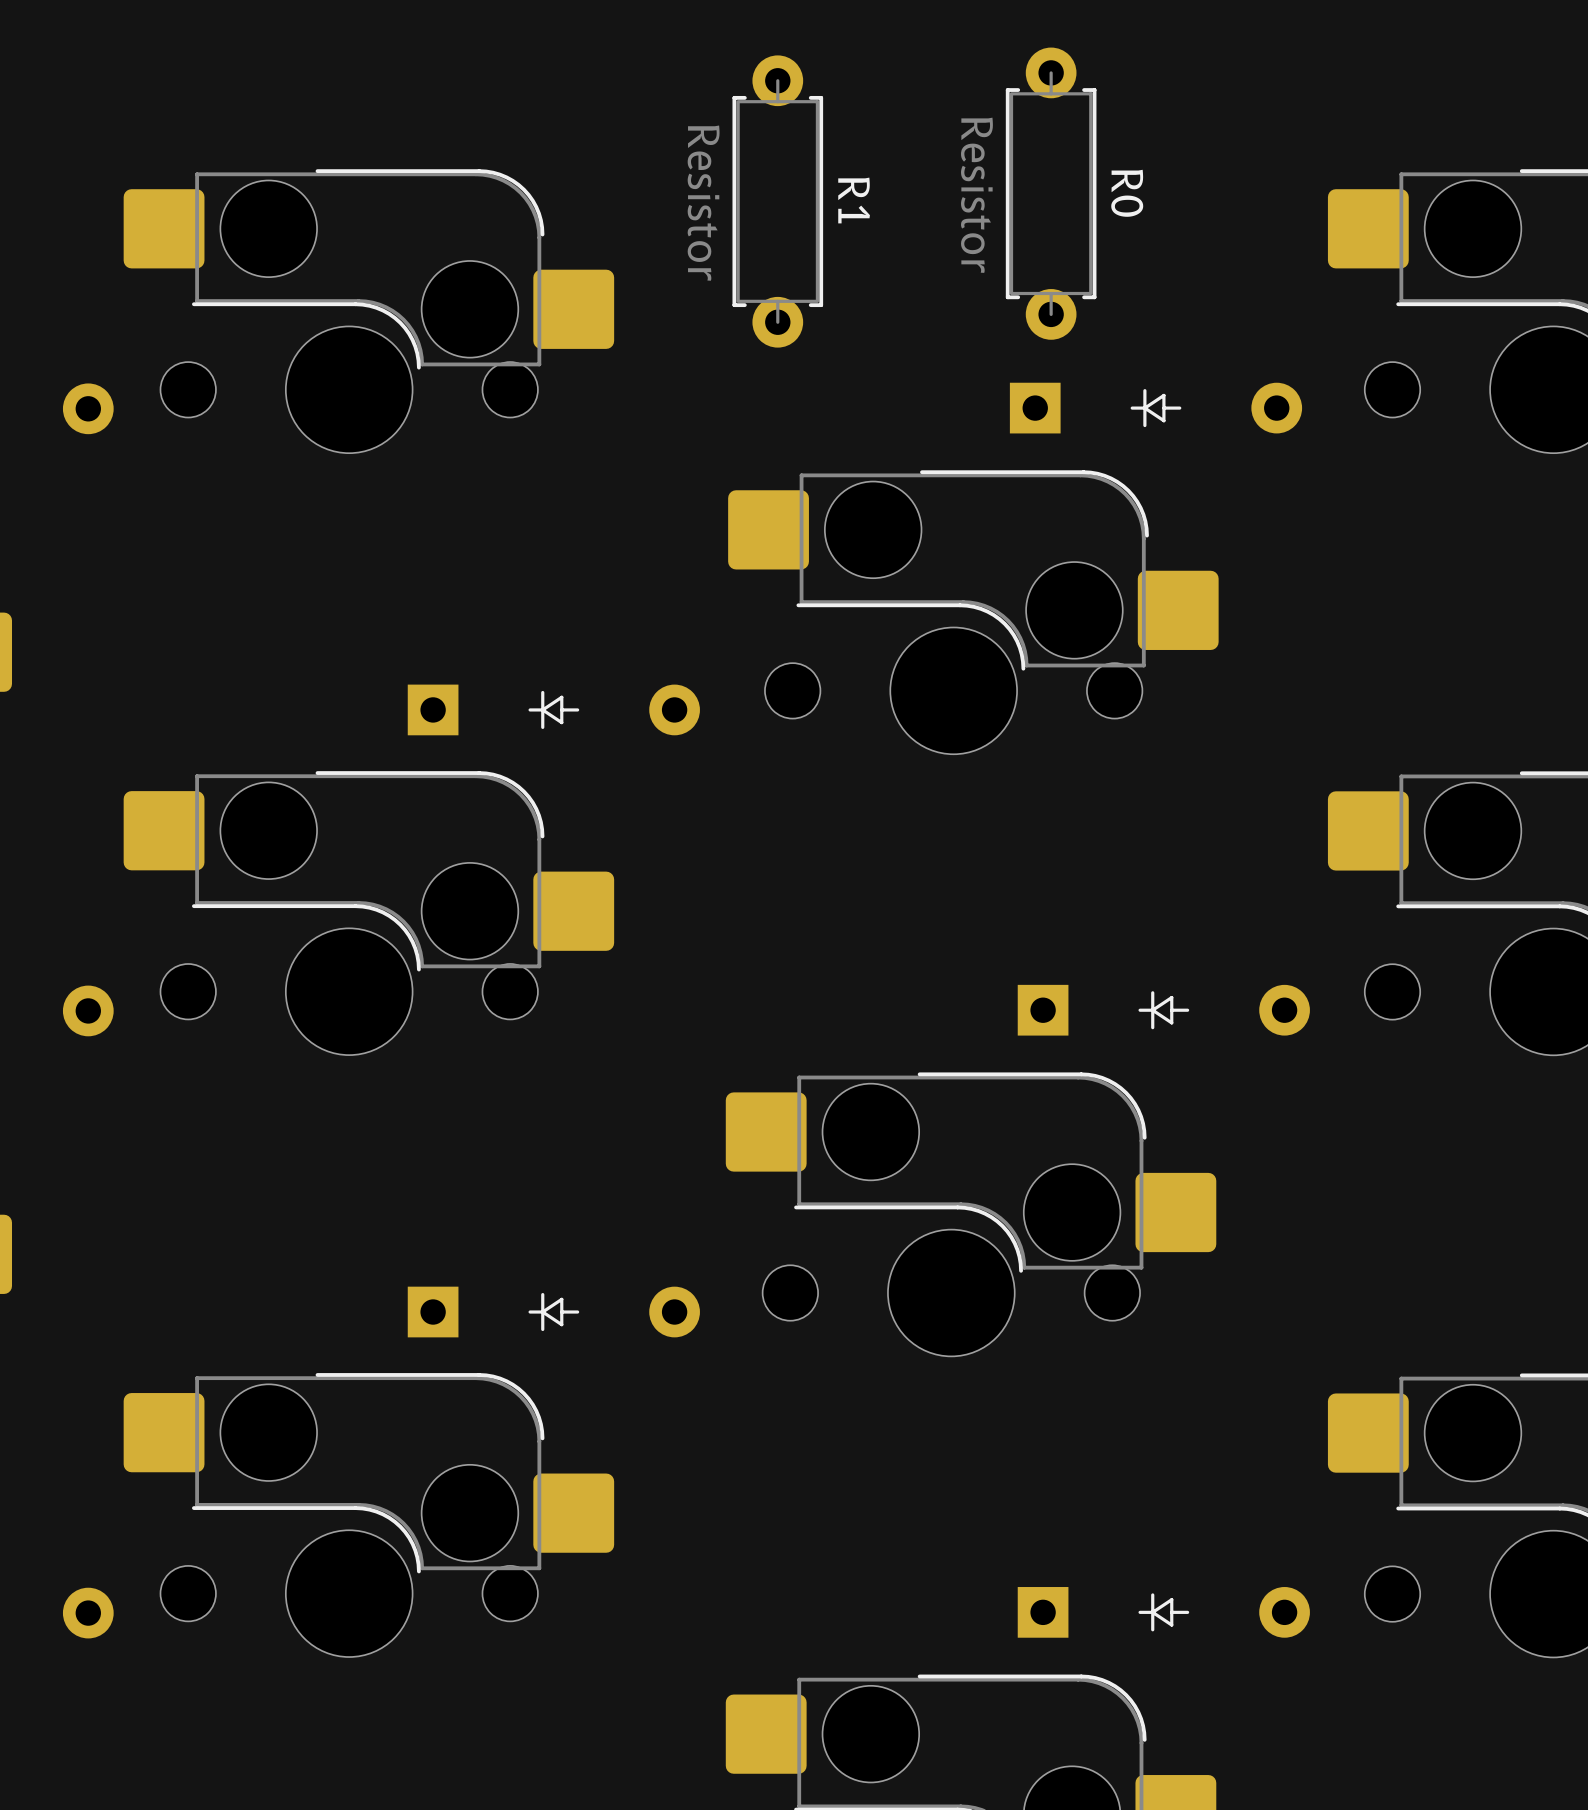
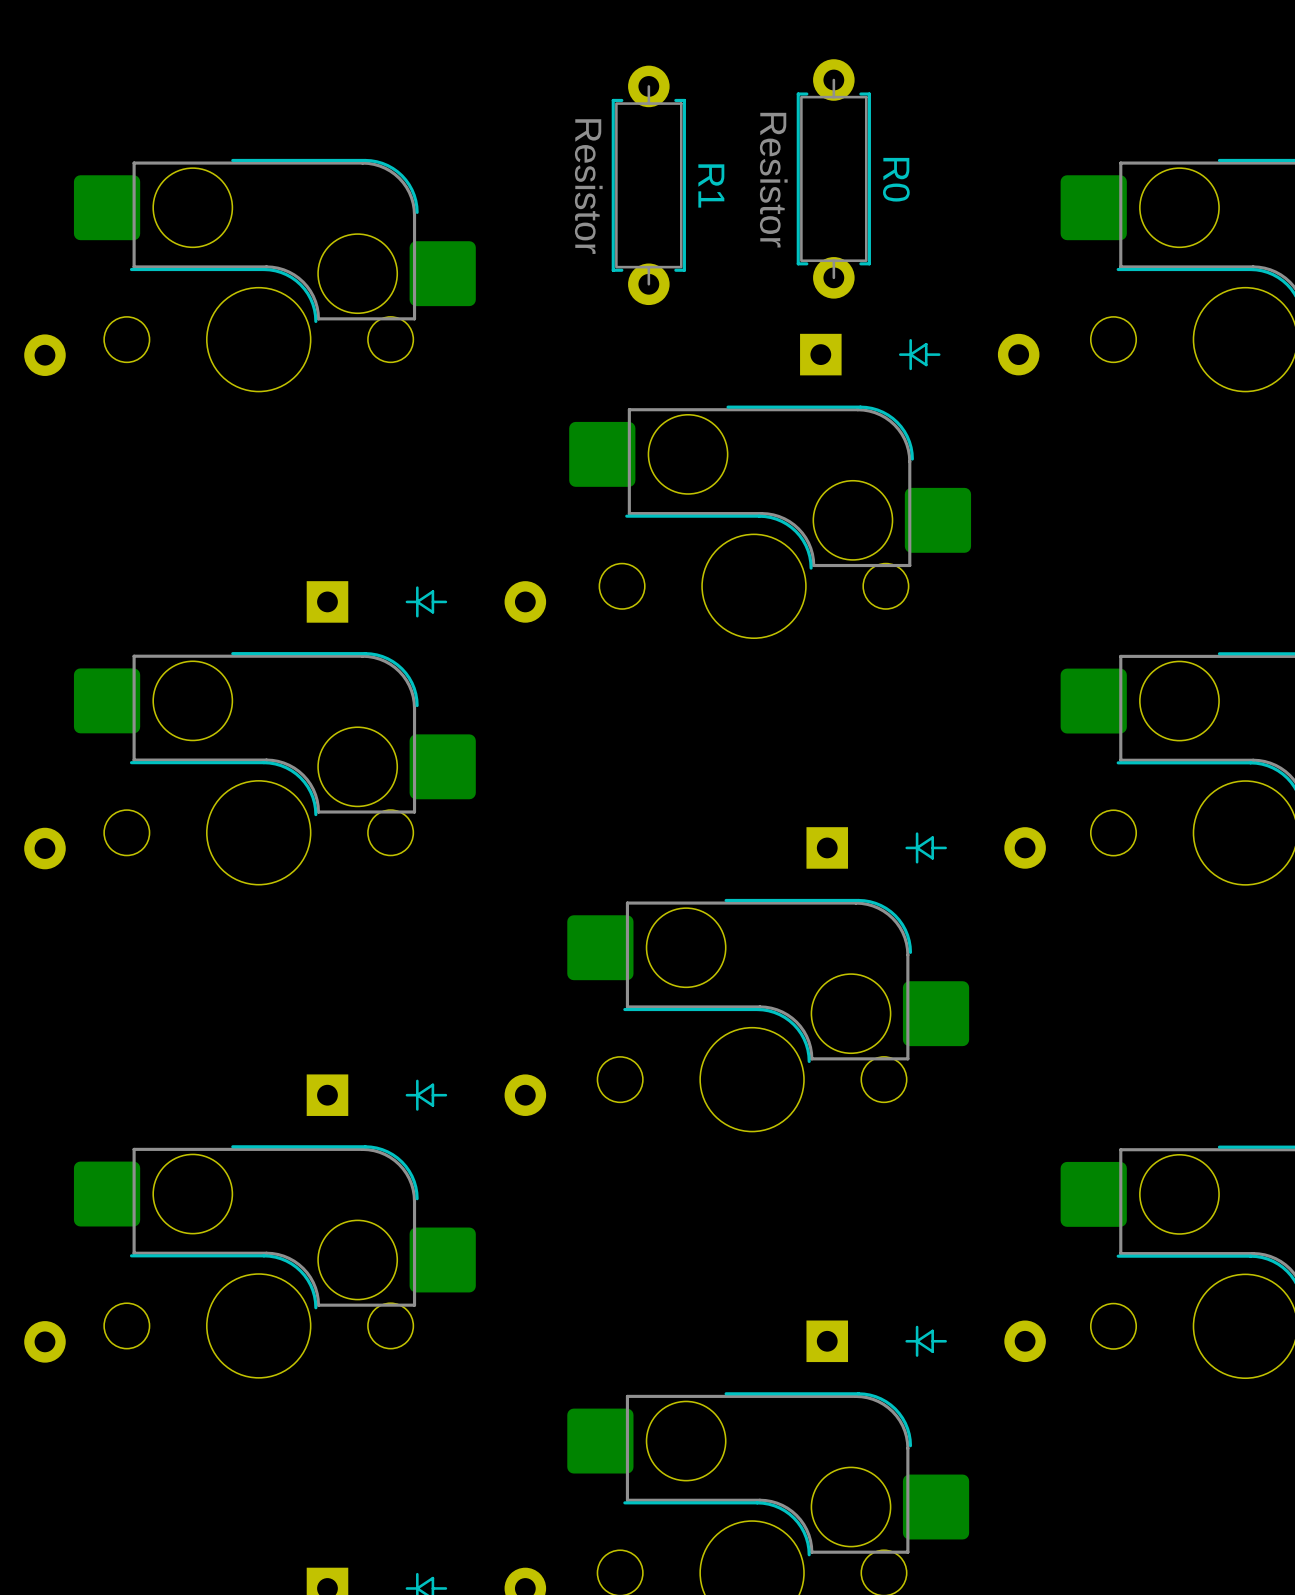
R1 position: (777, 201) -> (648, 185)

